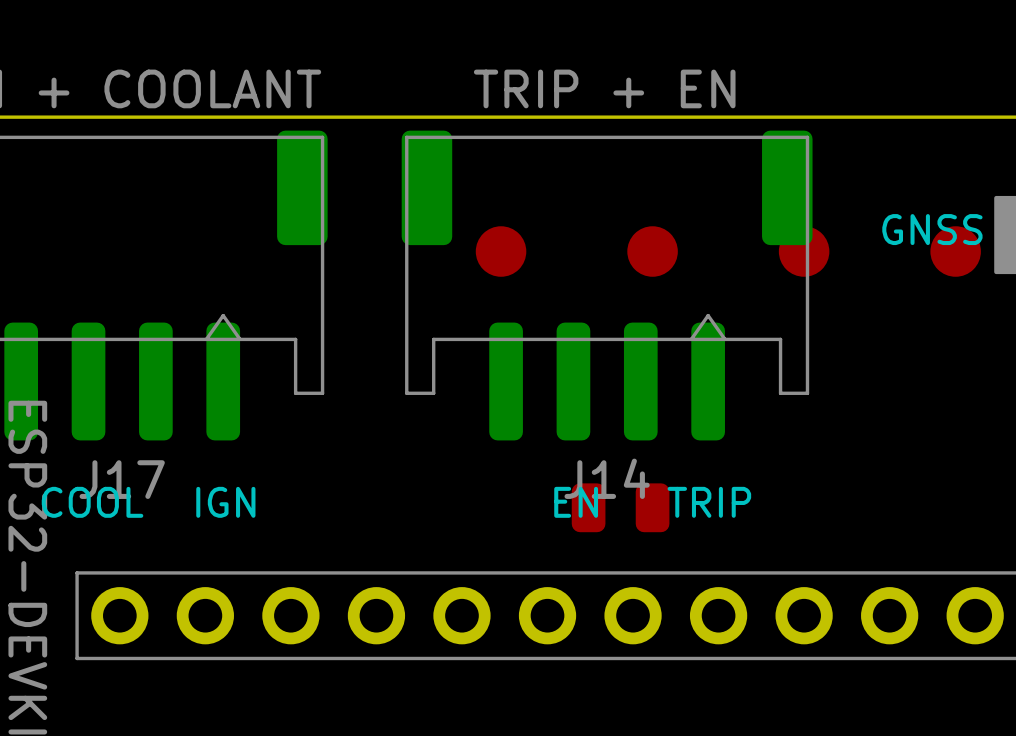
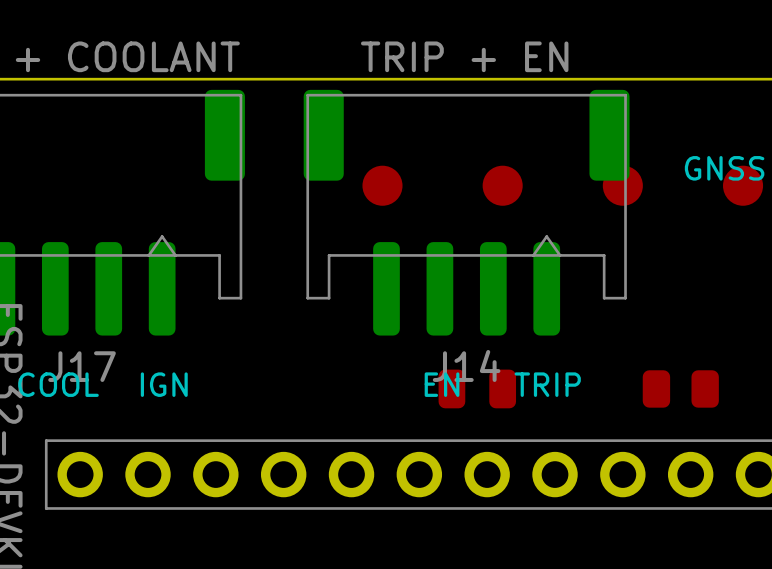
part: none -> (680, 388)

